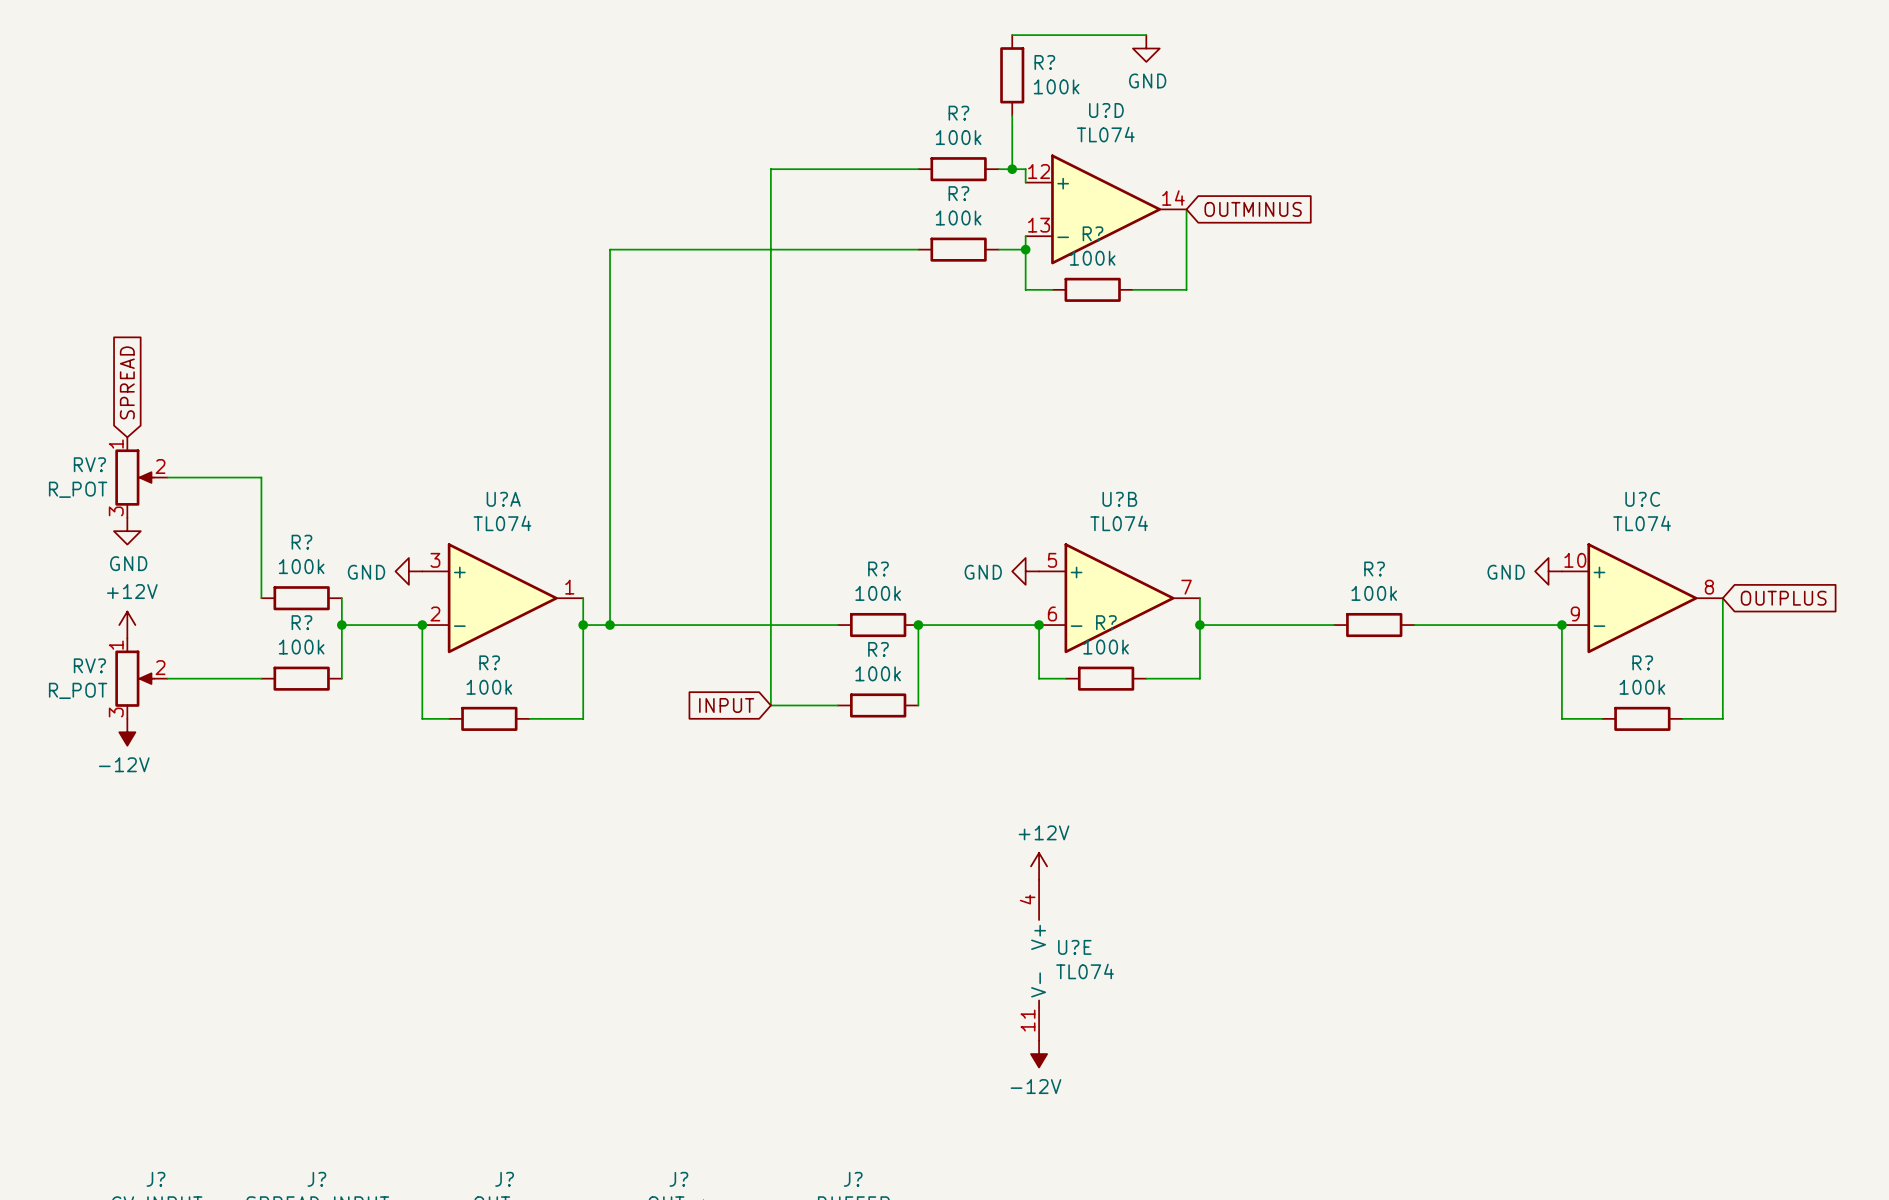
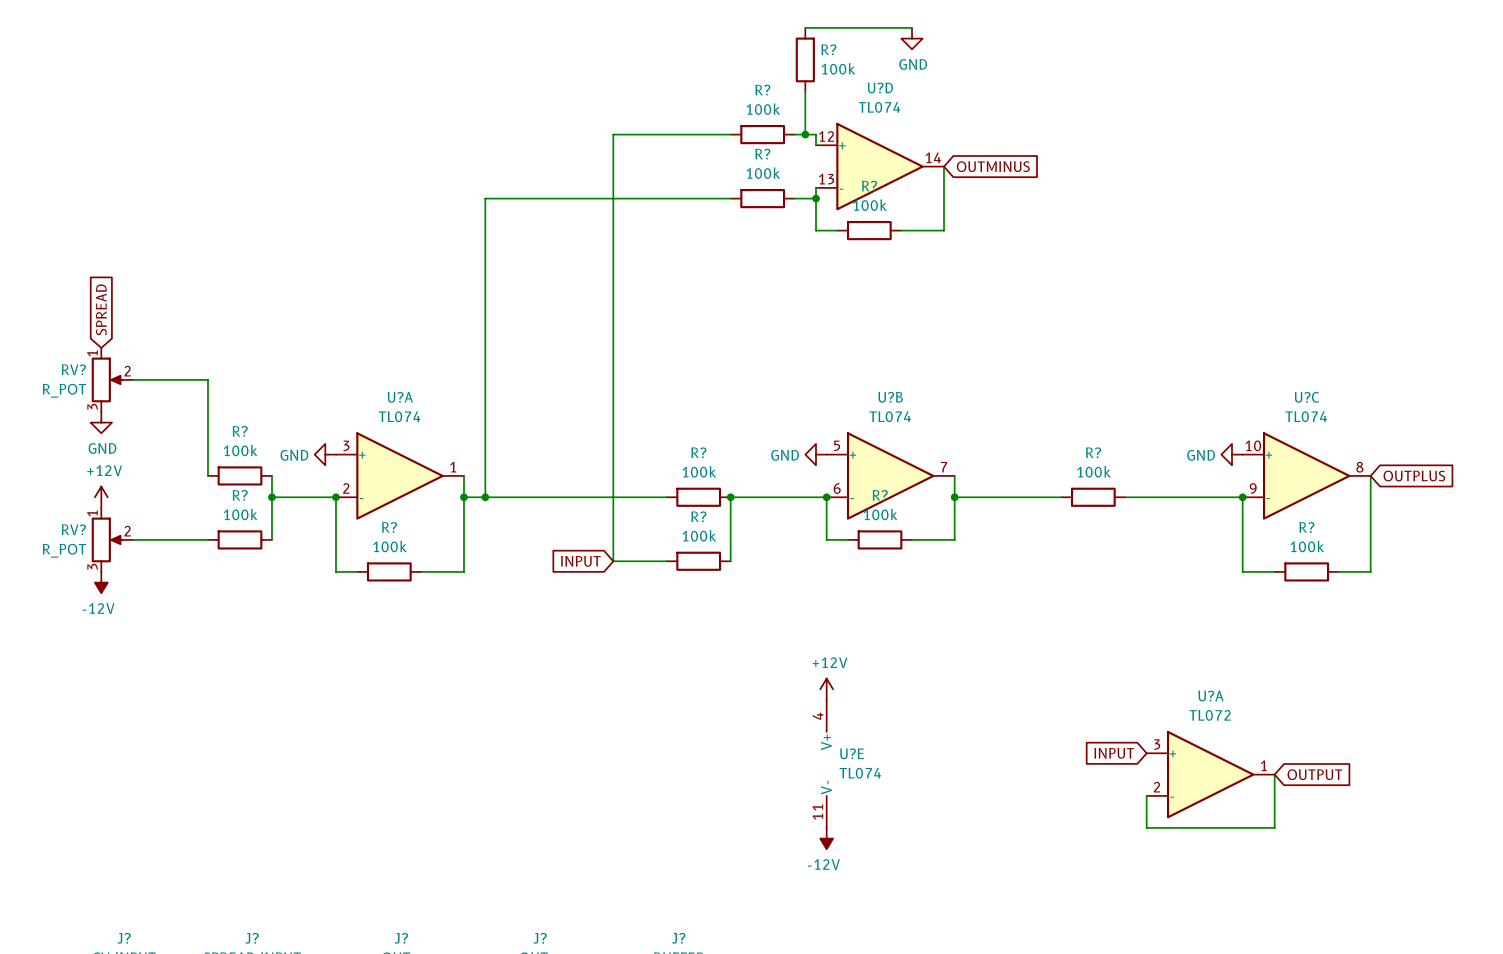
global label: none -> INPUT (1114, 753)
U?A: none -> TL072 (1210, 774)
wire: none -> (1274, 774) (1274, 827) (1146, 827) (1146, 795)
global label: none -> OUTPUT (1314, 774)

